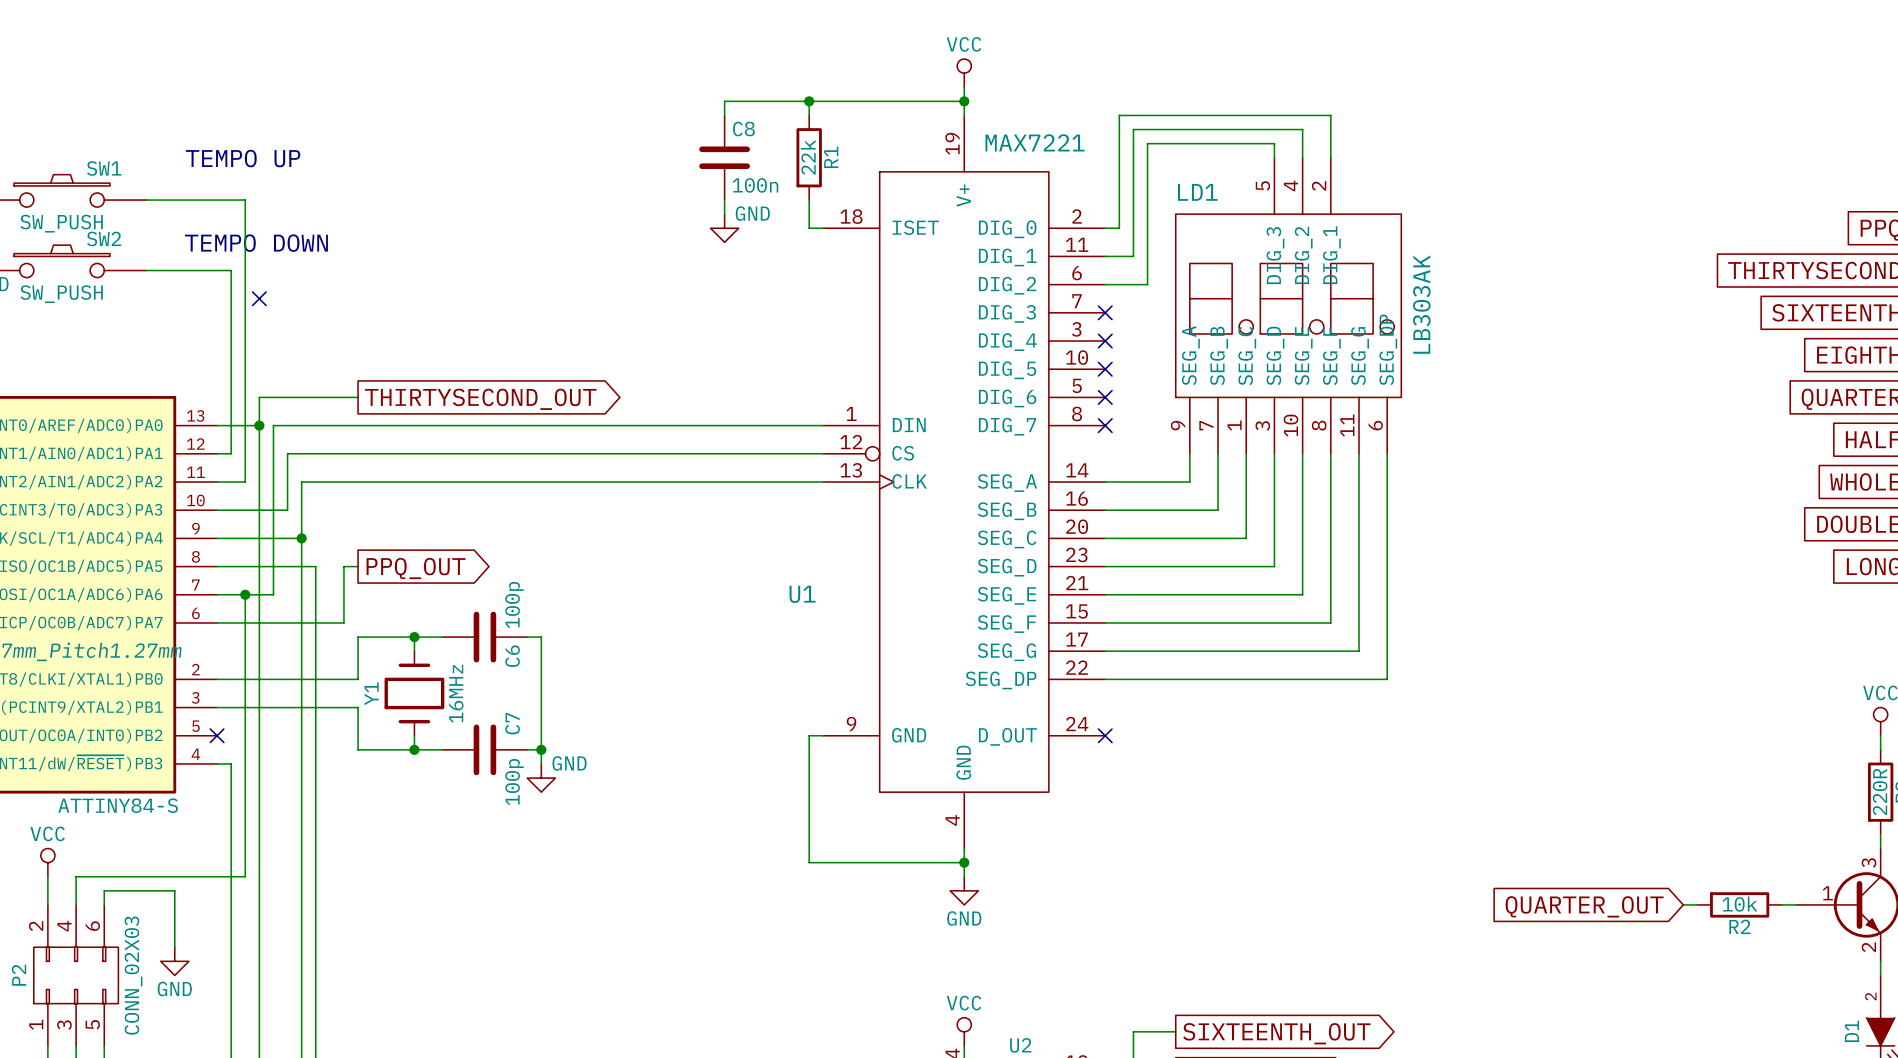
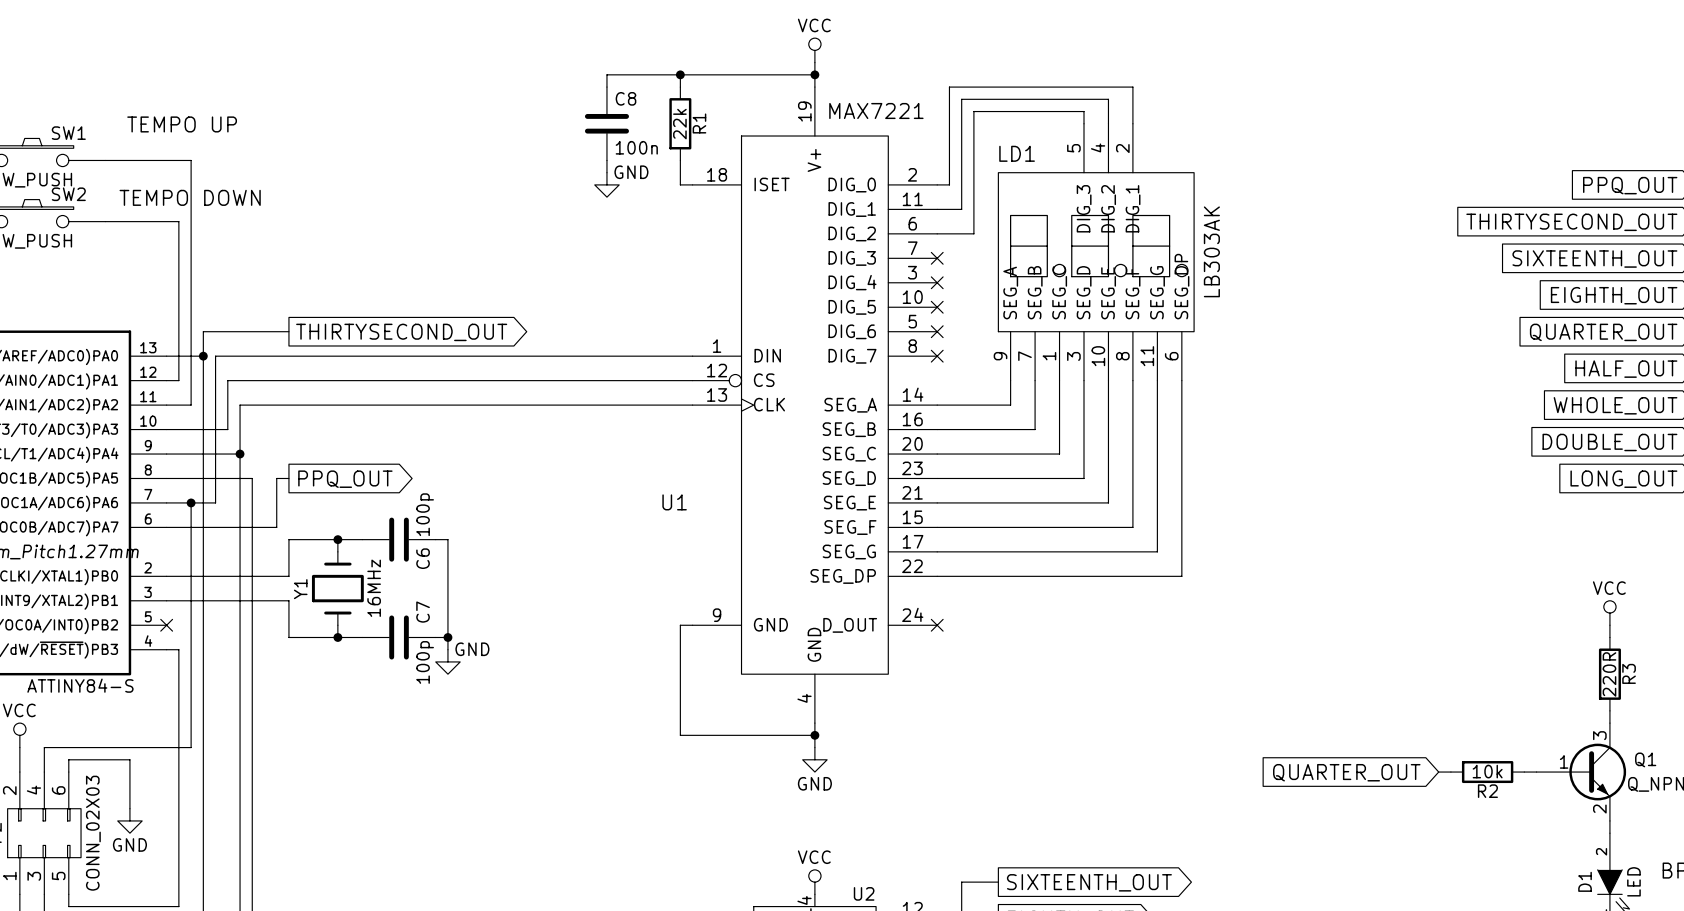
no-connect mark: (259, 298) -> none

